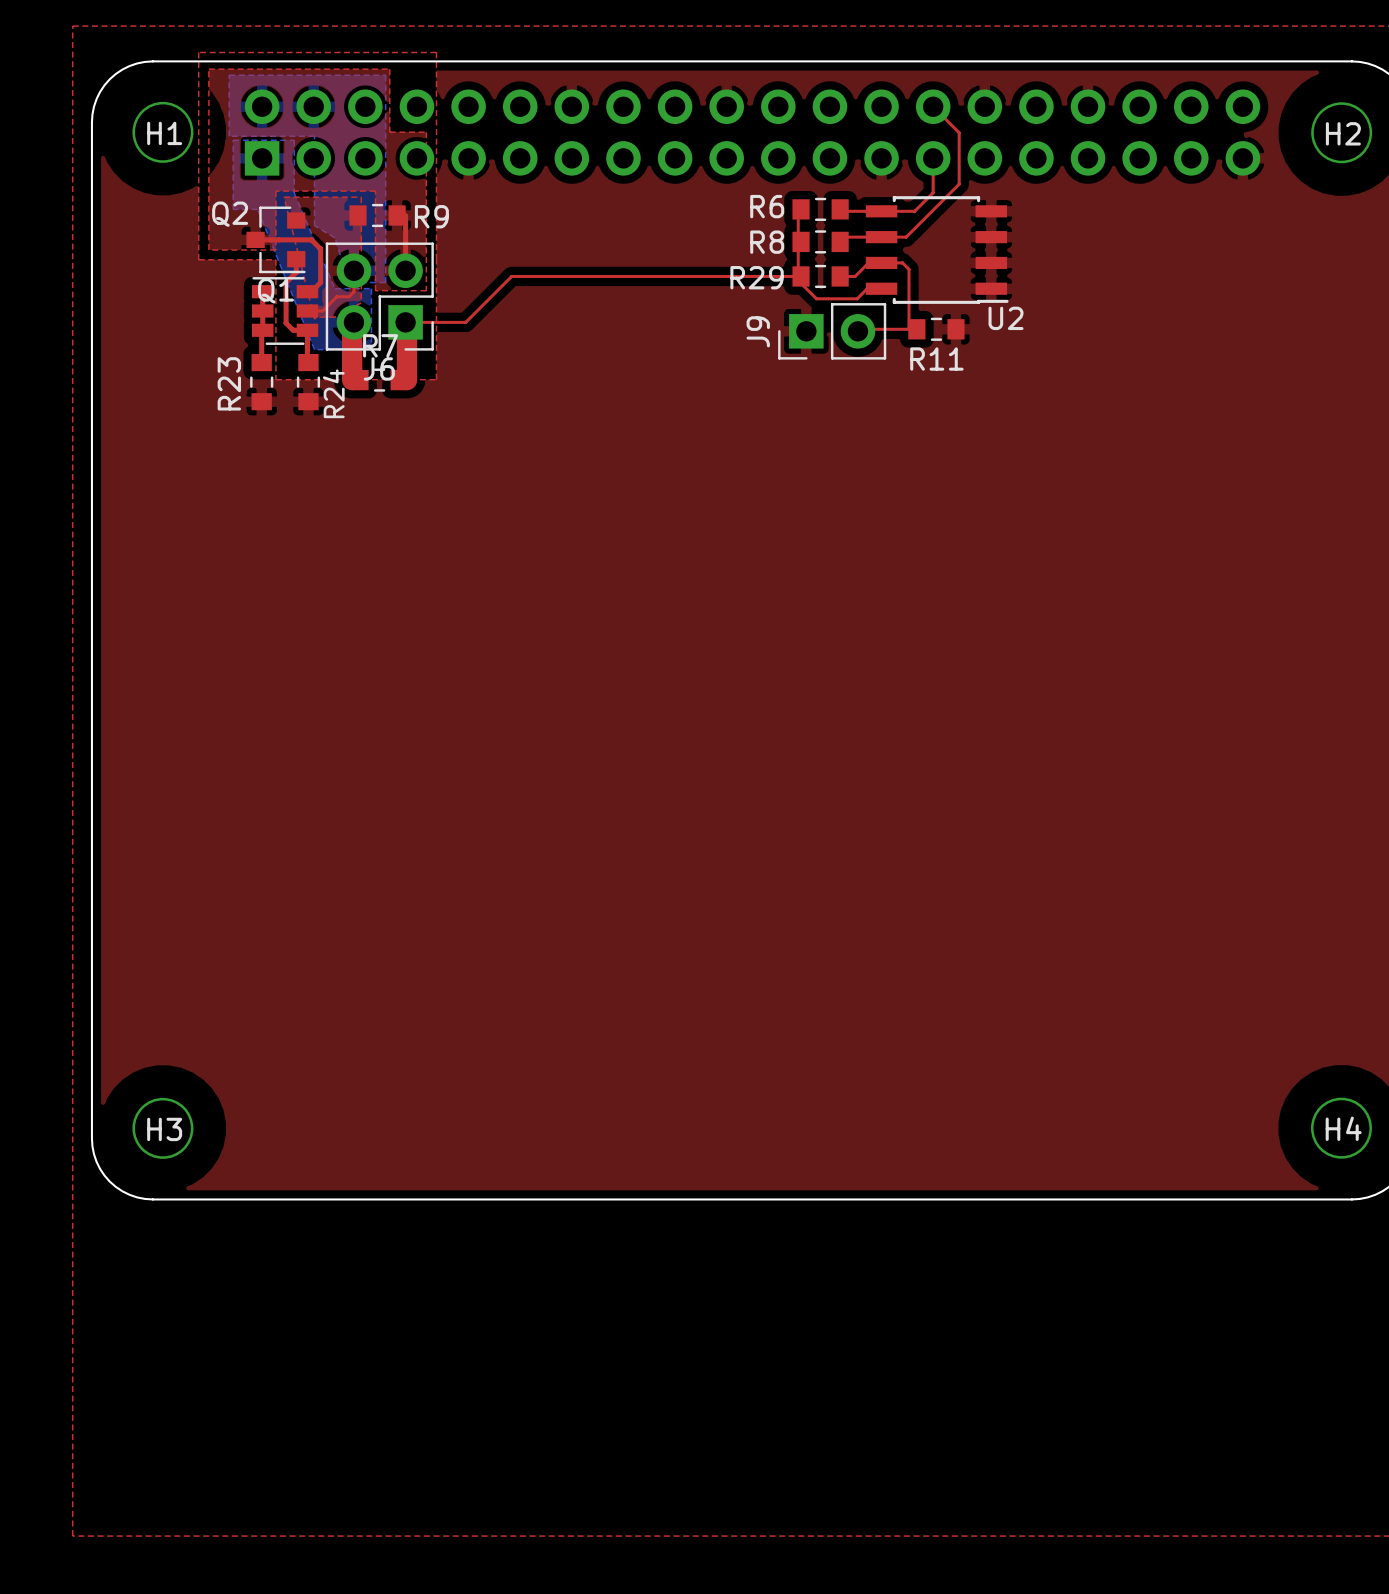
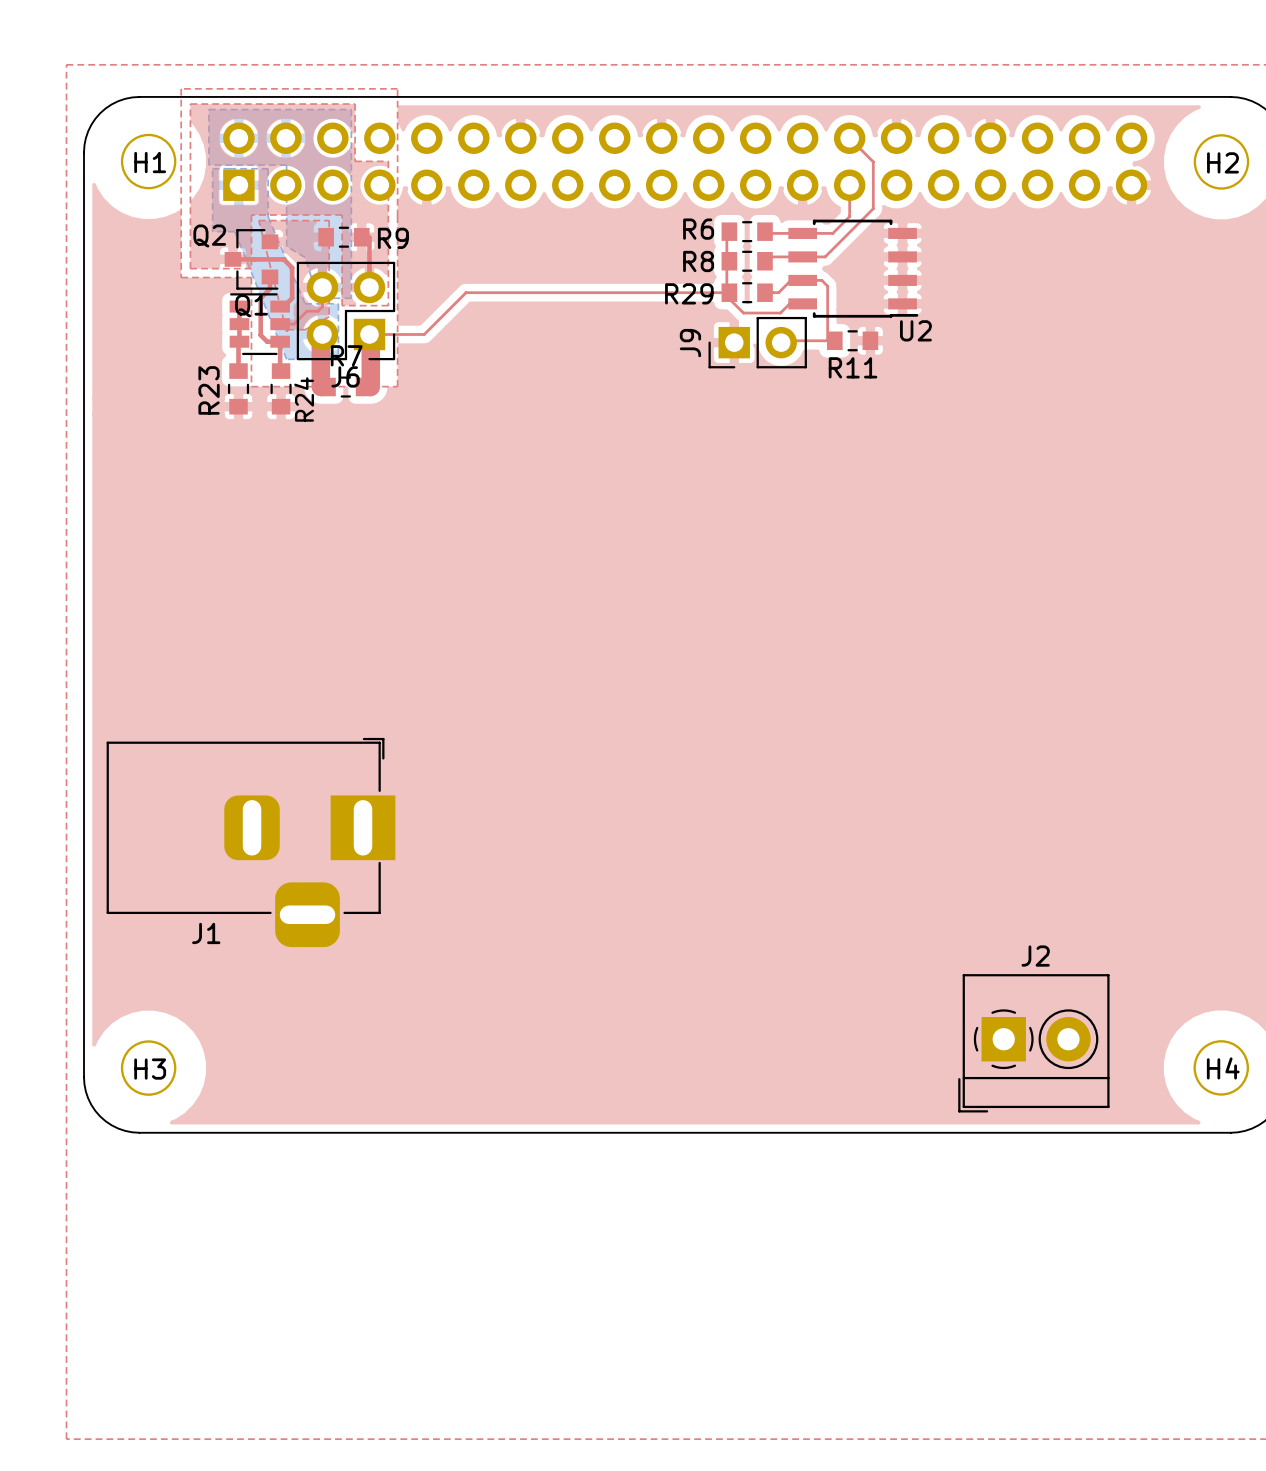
J1: none -> (251, 842)
J2: none -> (1033, 1043)

